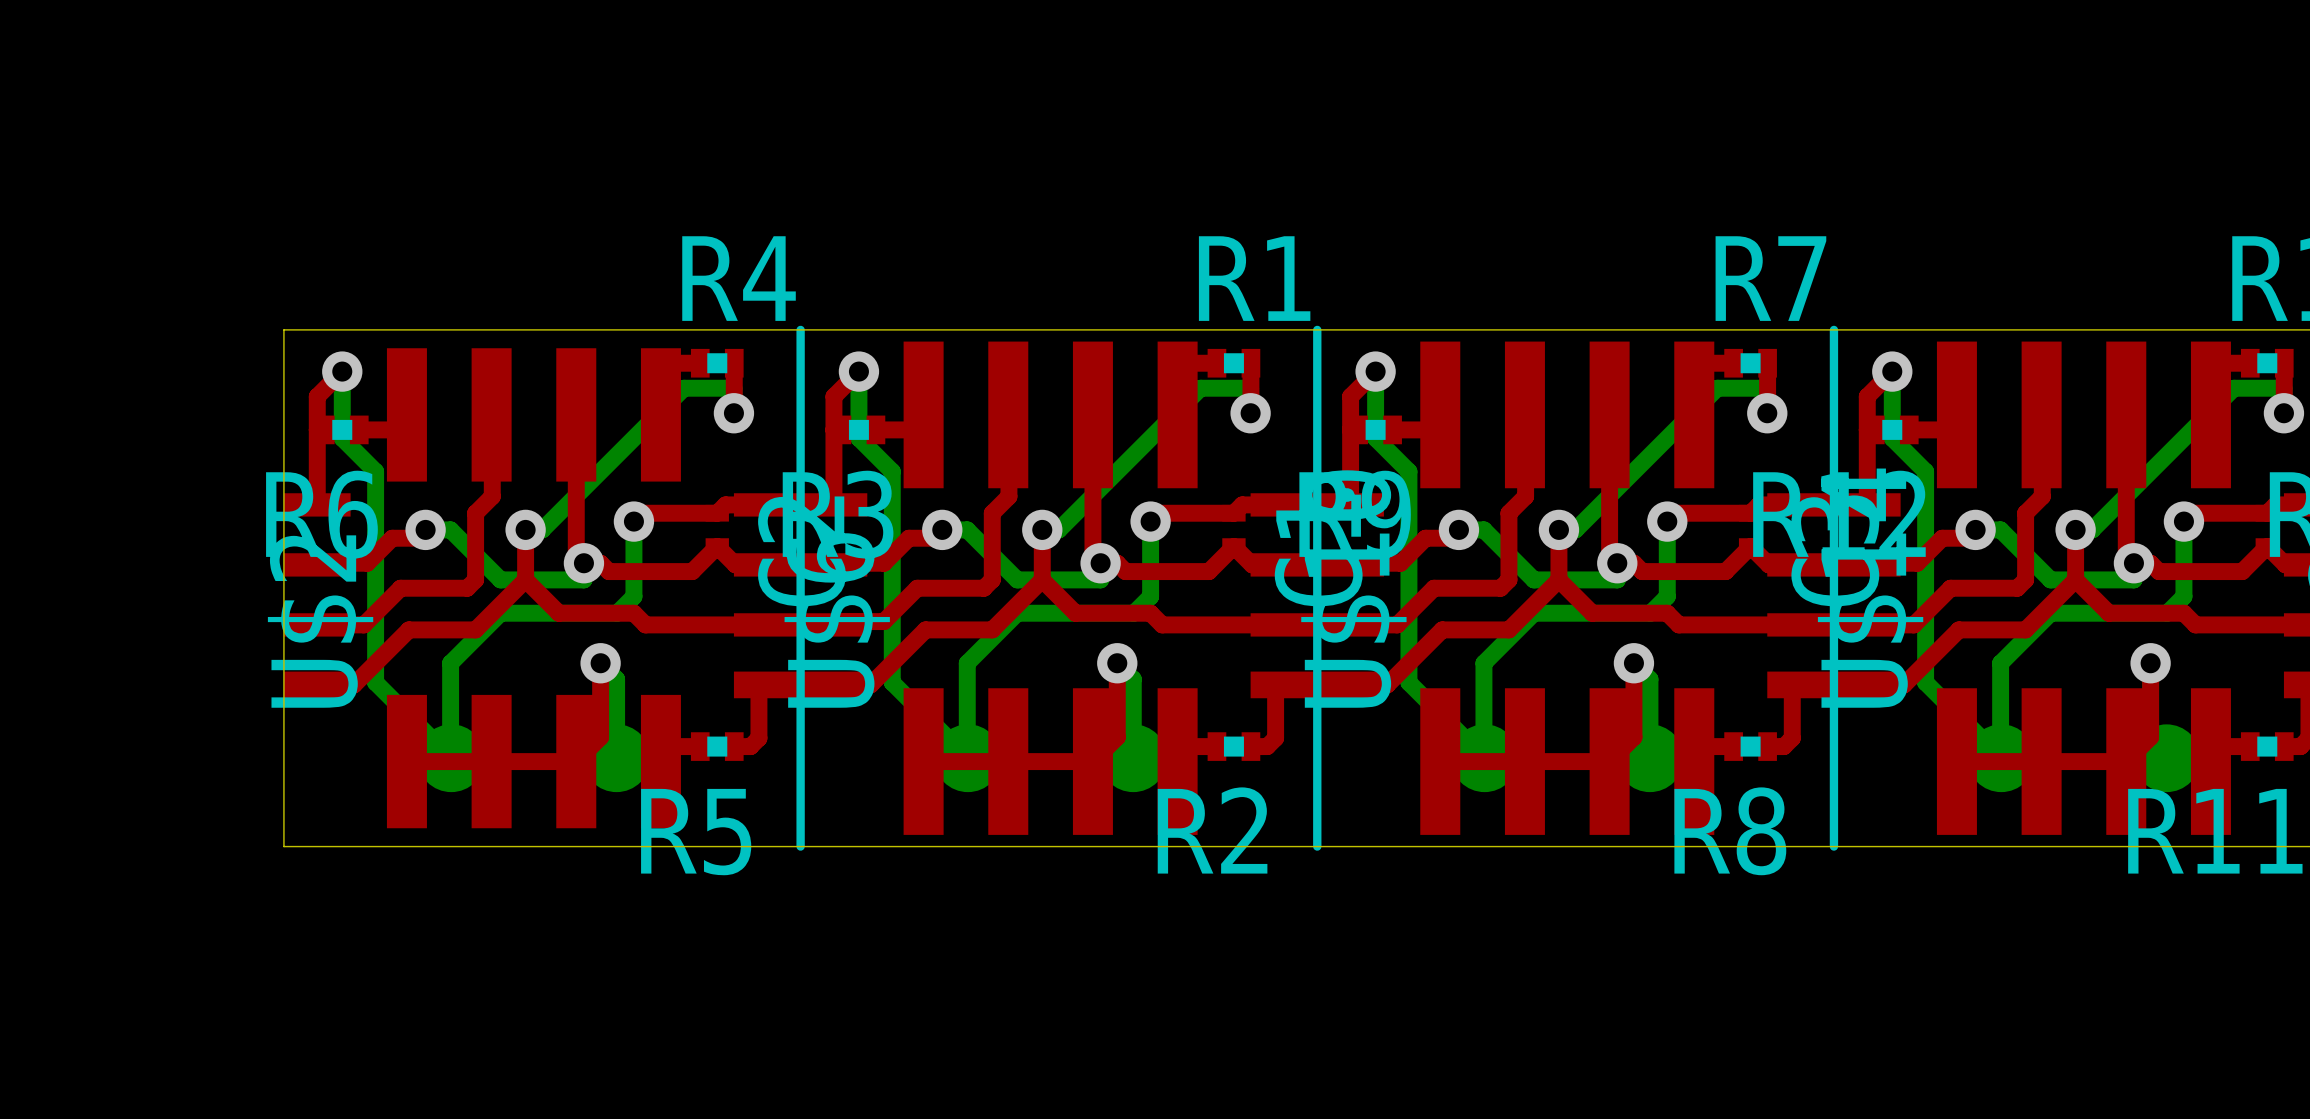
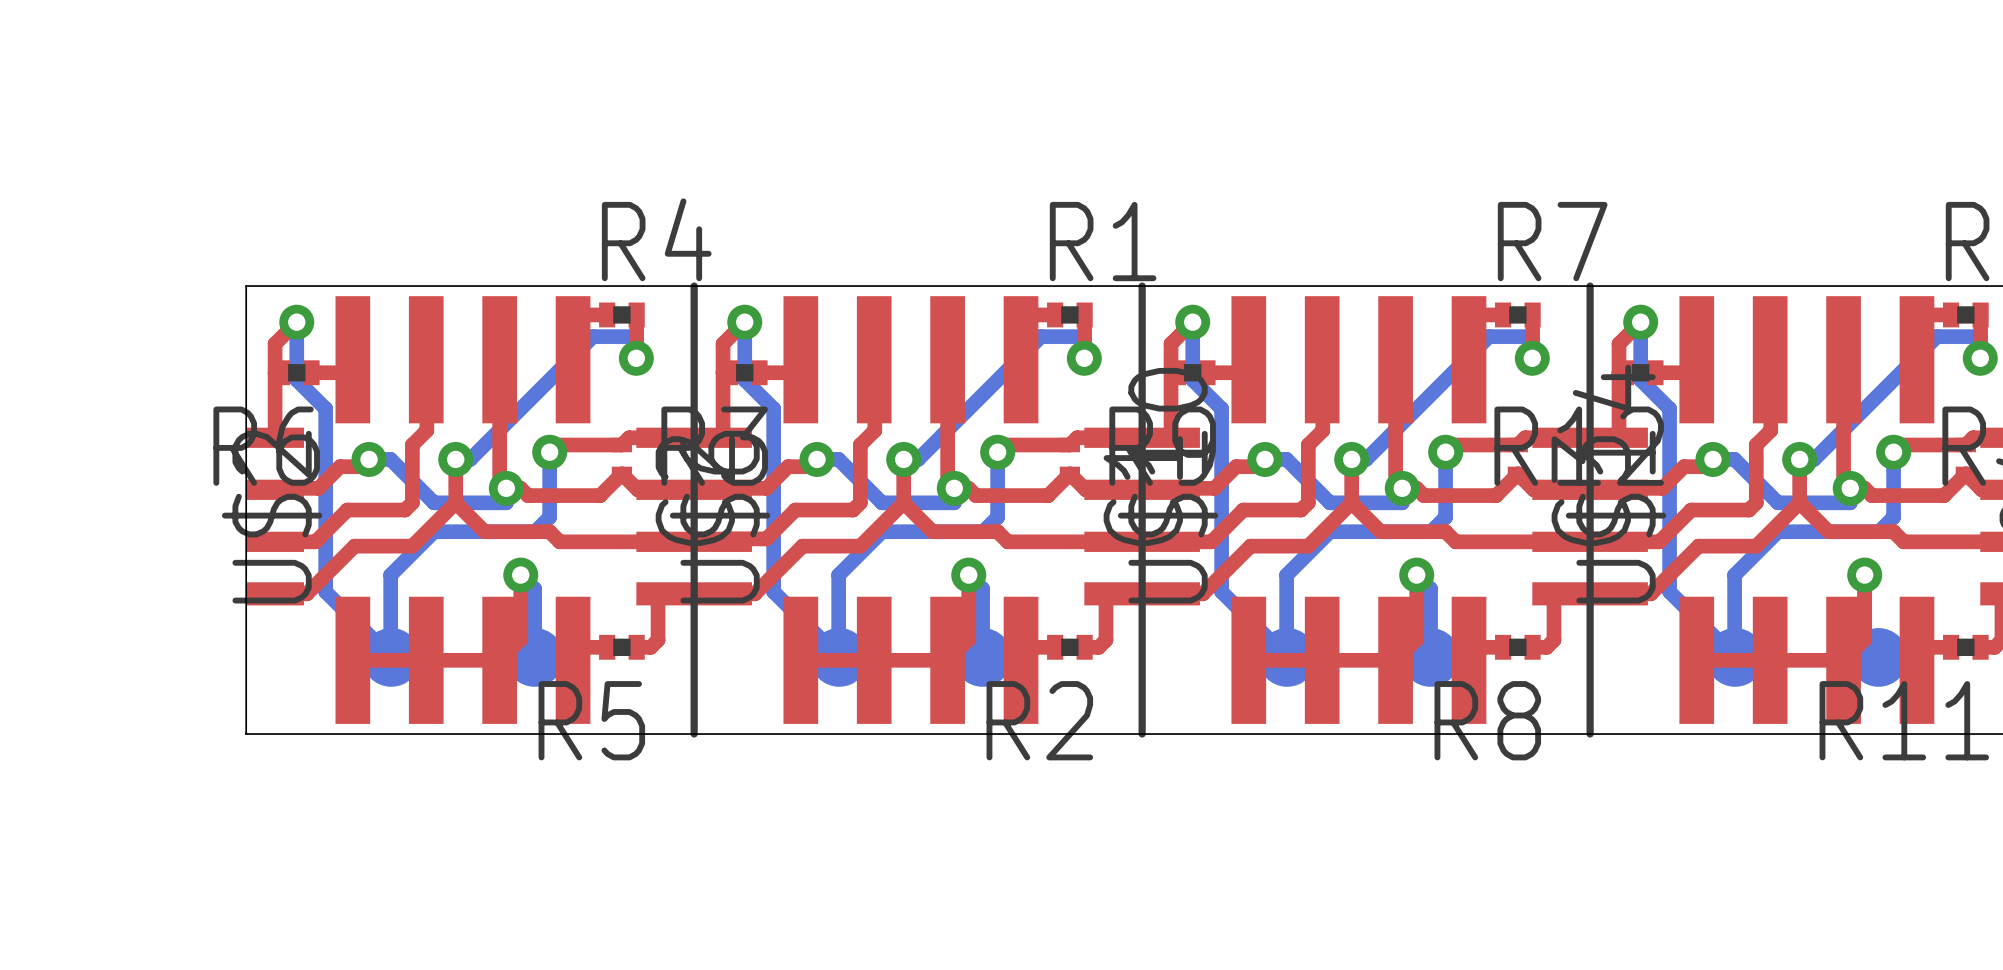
U$2 footprint: [386, 348, 681, 829] -> [335, 296, 591, 724]

